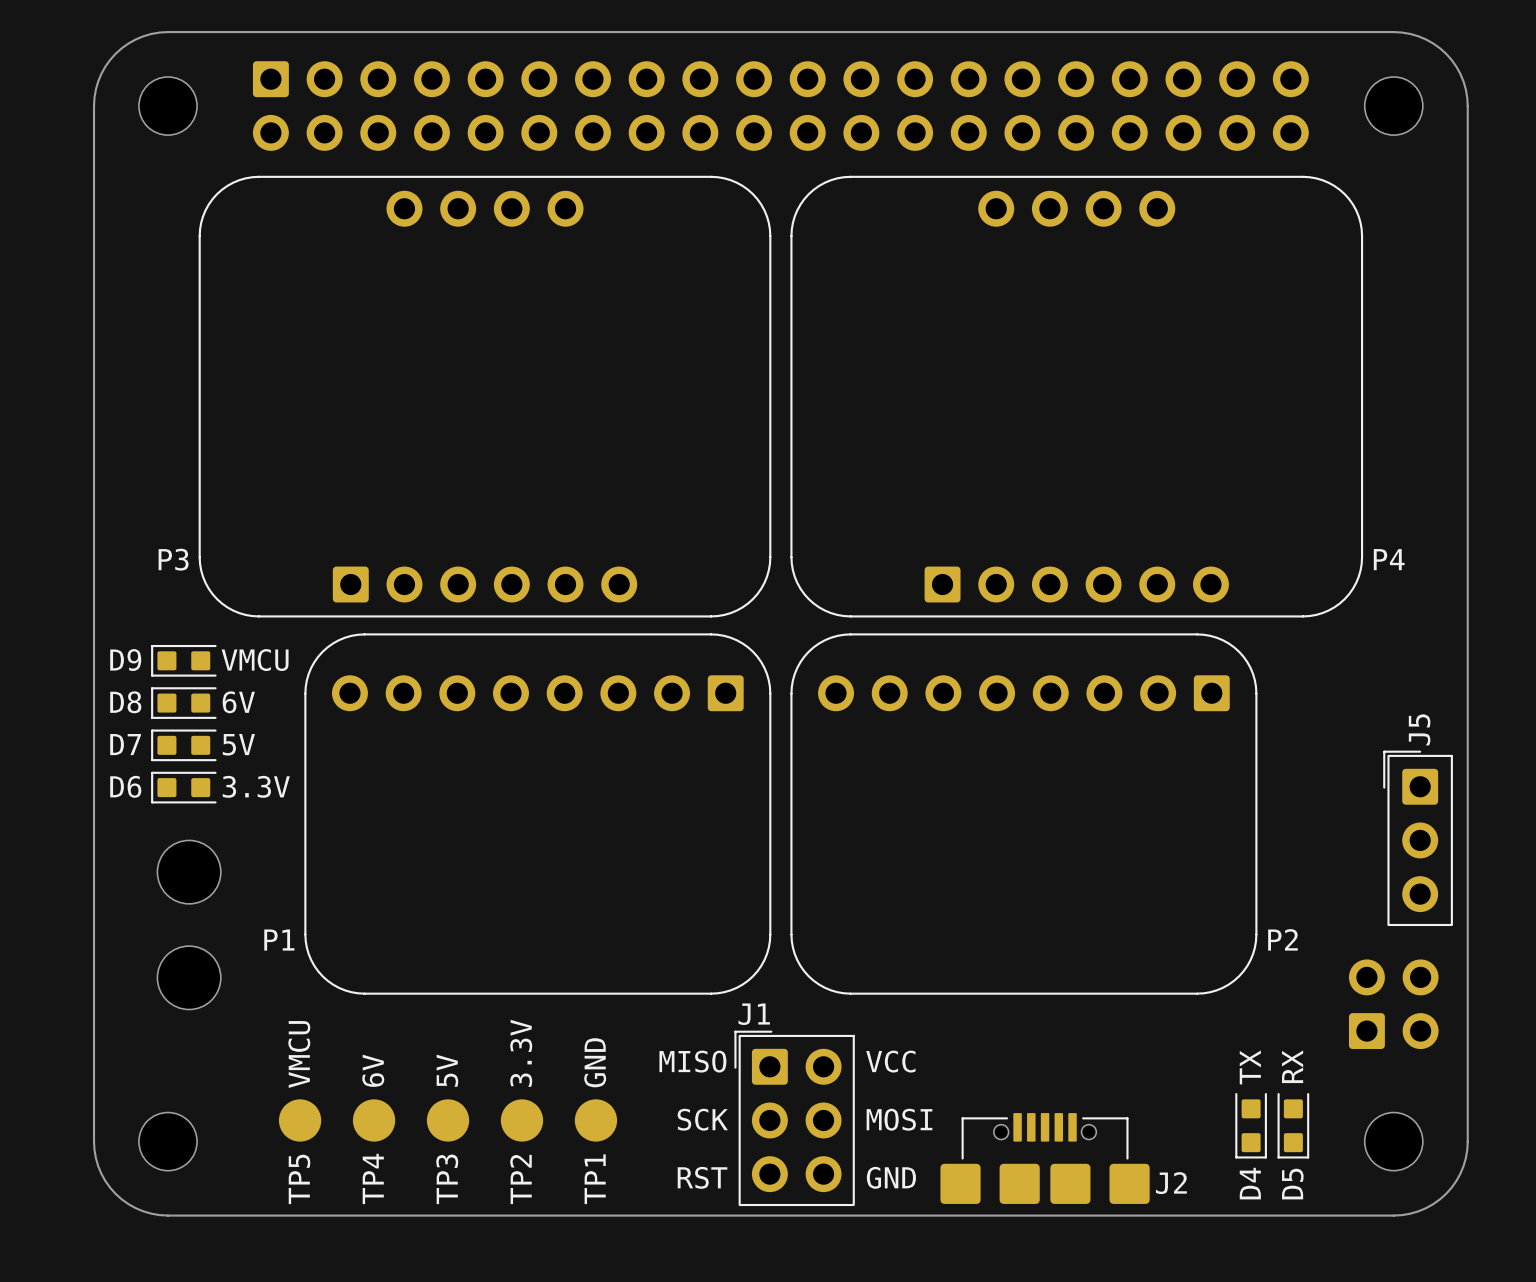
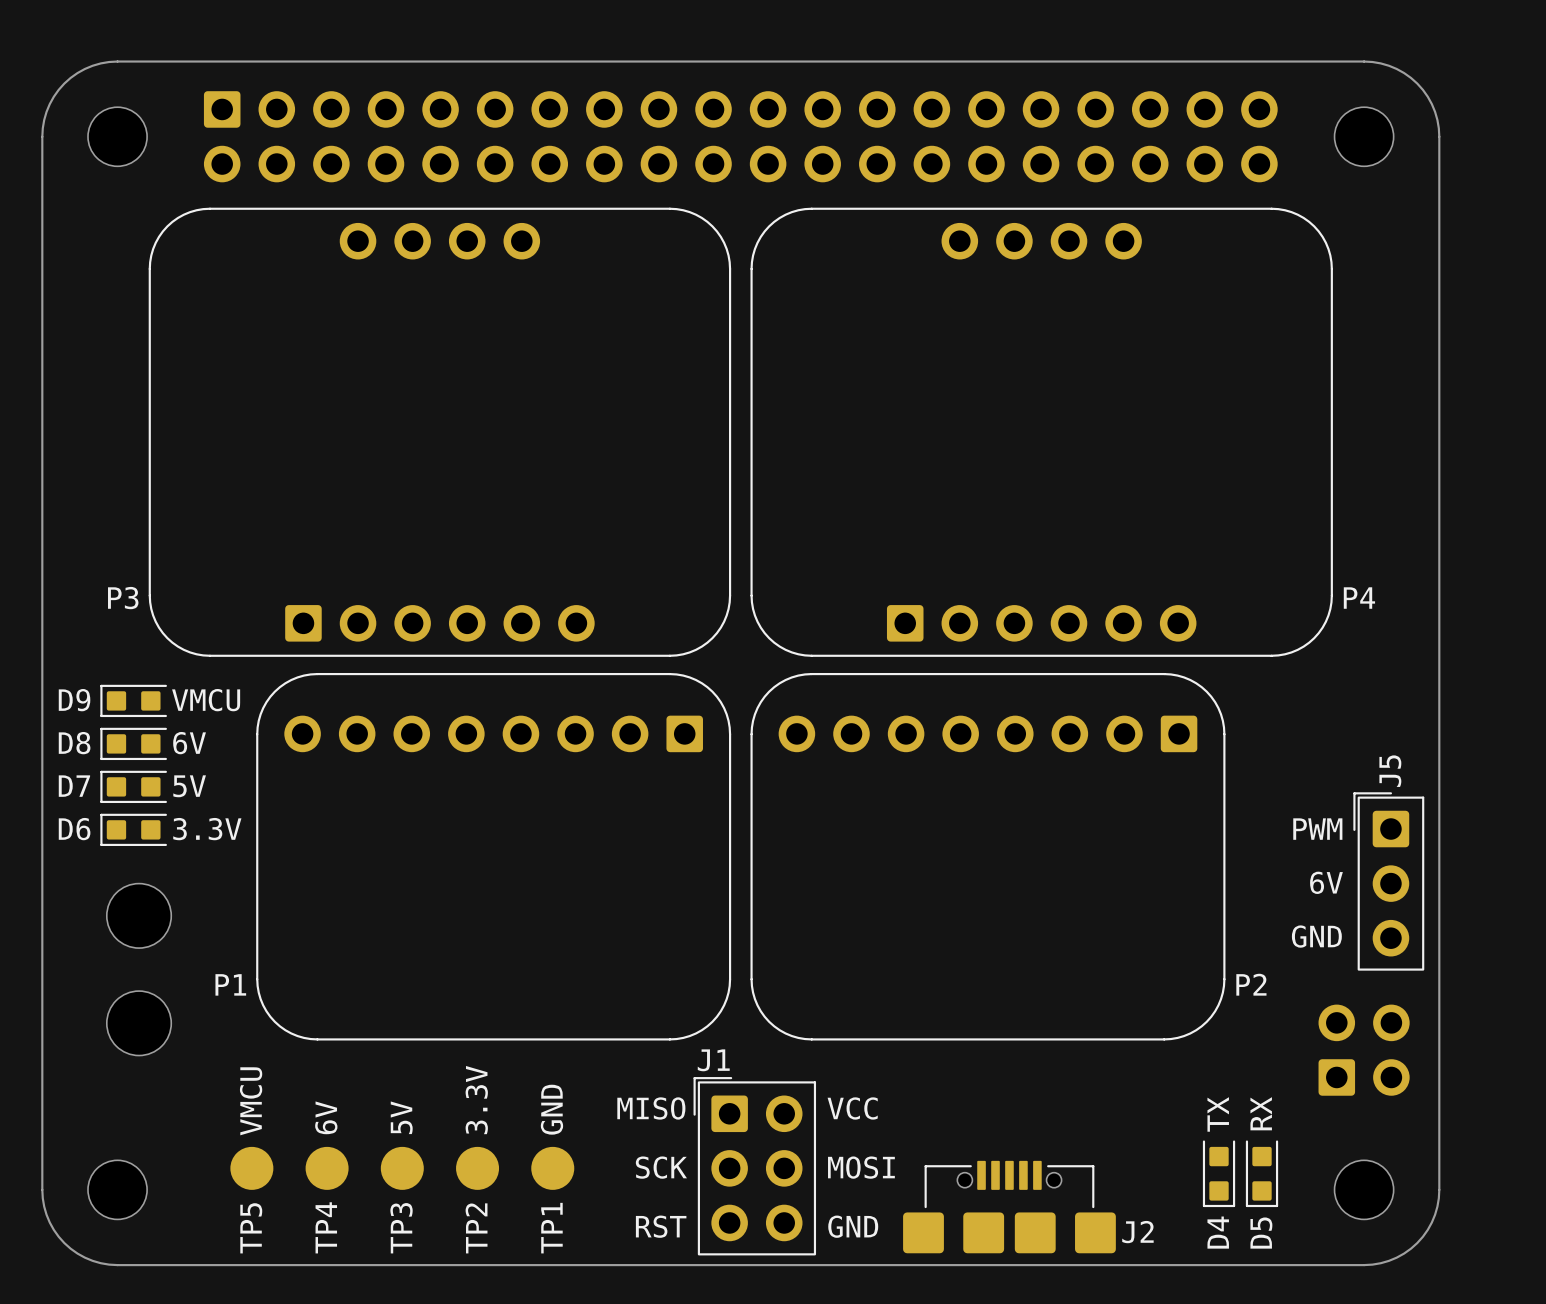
text: none -> PWM (1317, 829)
text: none -> 6V (1326, 882)
text: none -> GND (1316, 936)

